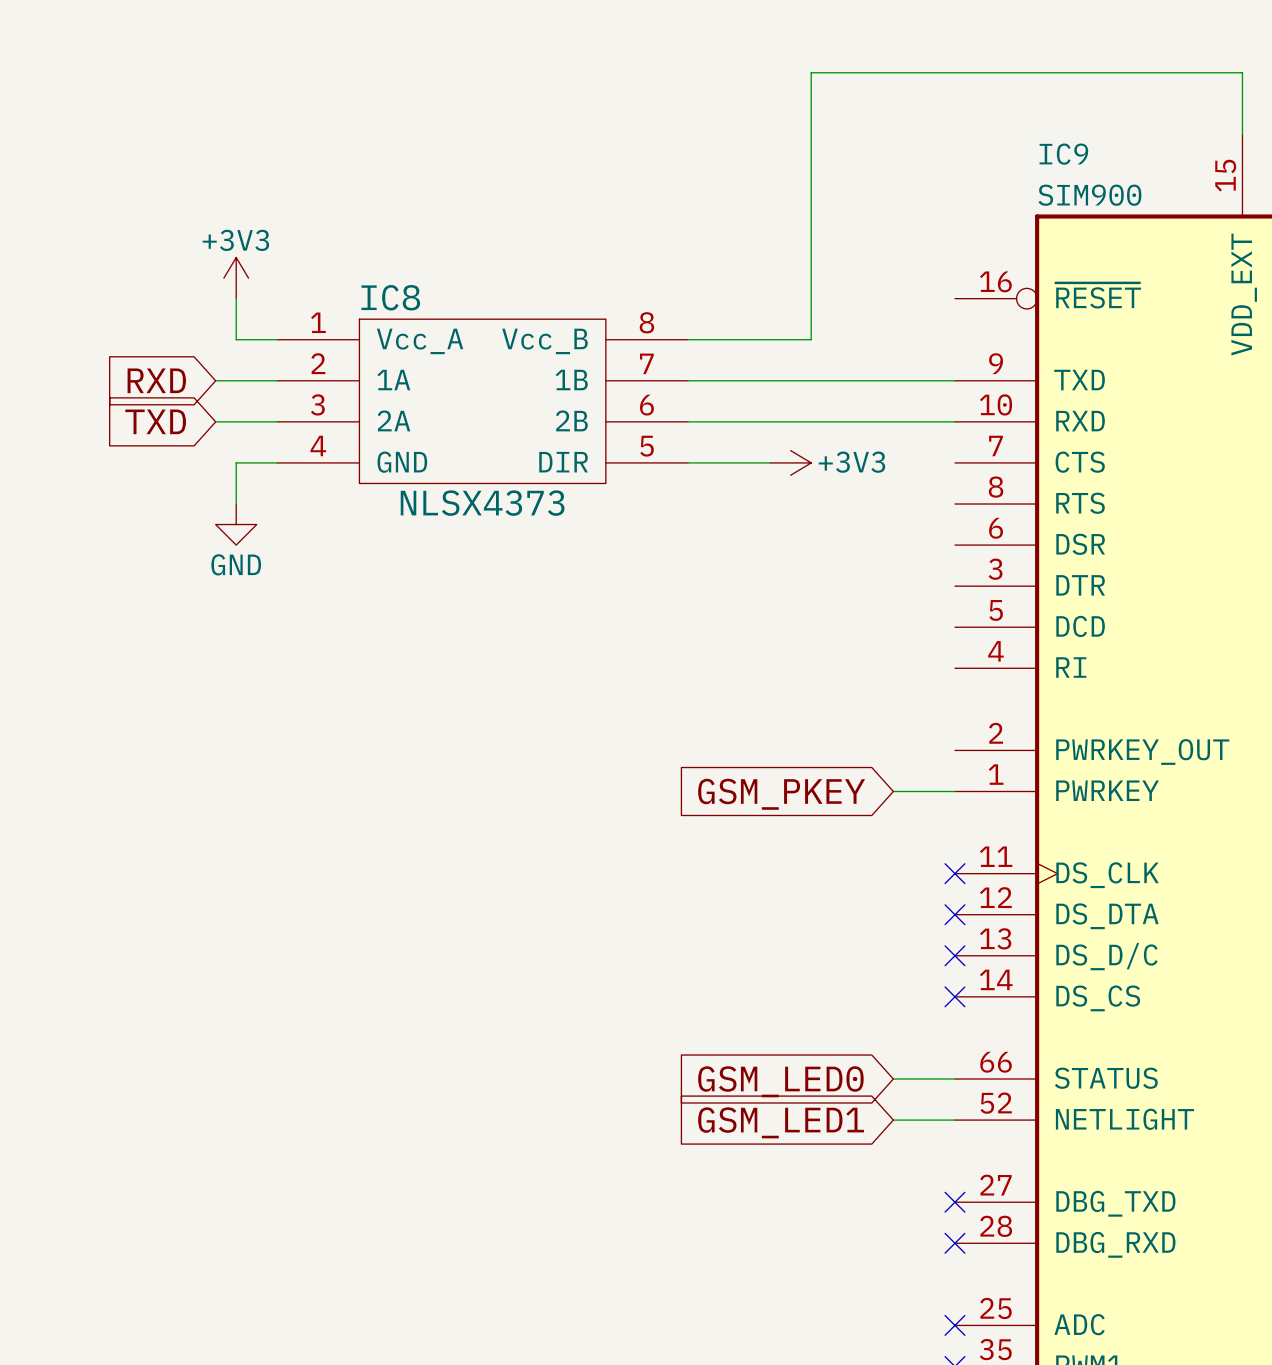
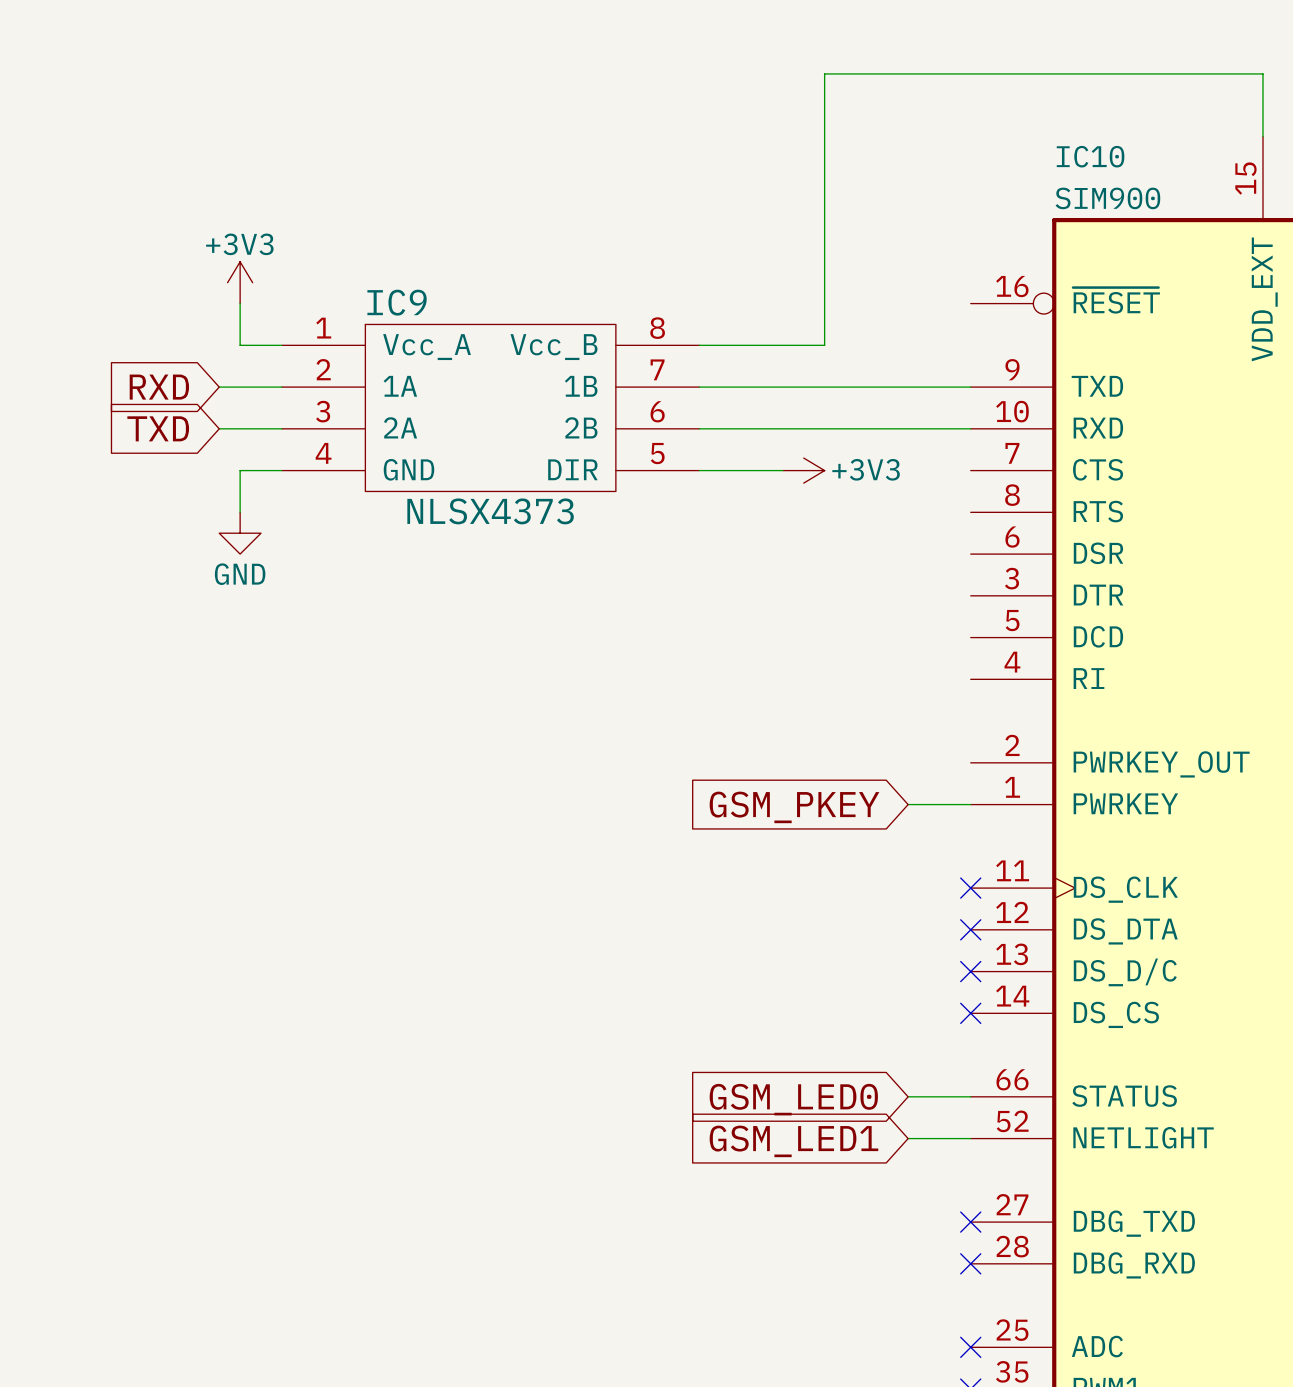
IC9 name: IC9 (1063, 154) -> IC10 (1090, 156)
IC8 name: IC8 (390, 297) -> IC9 (397, 302)

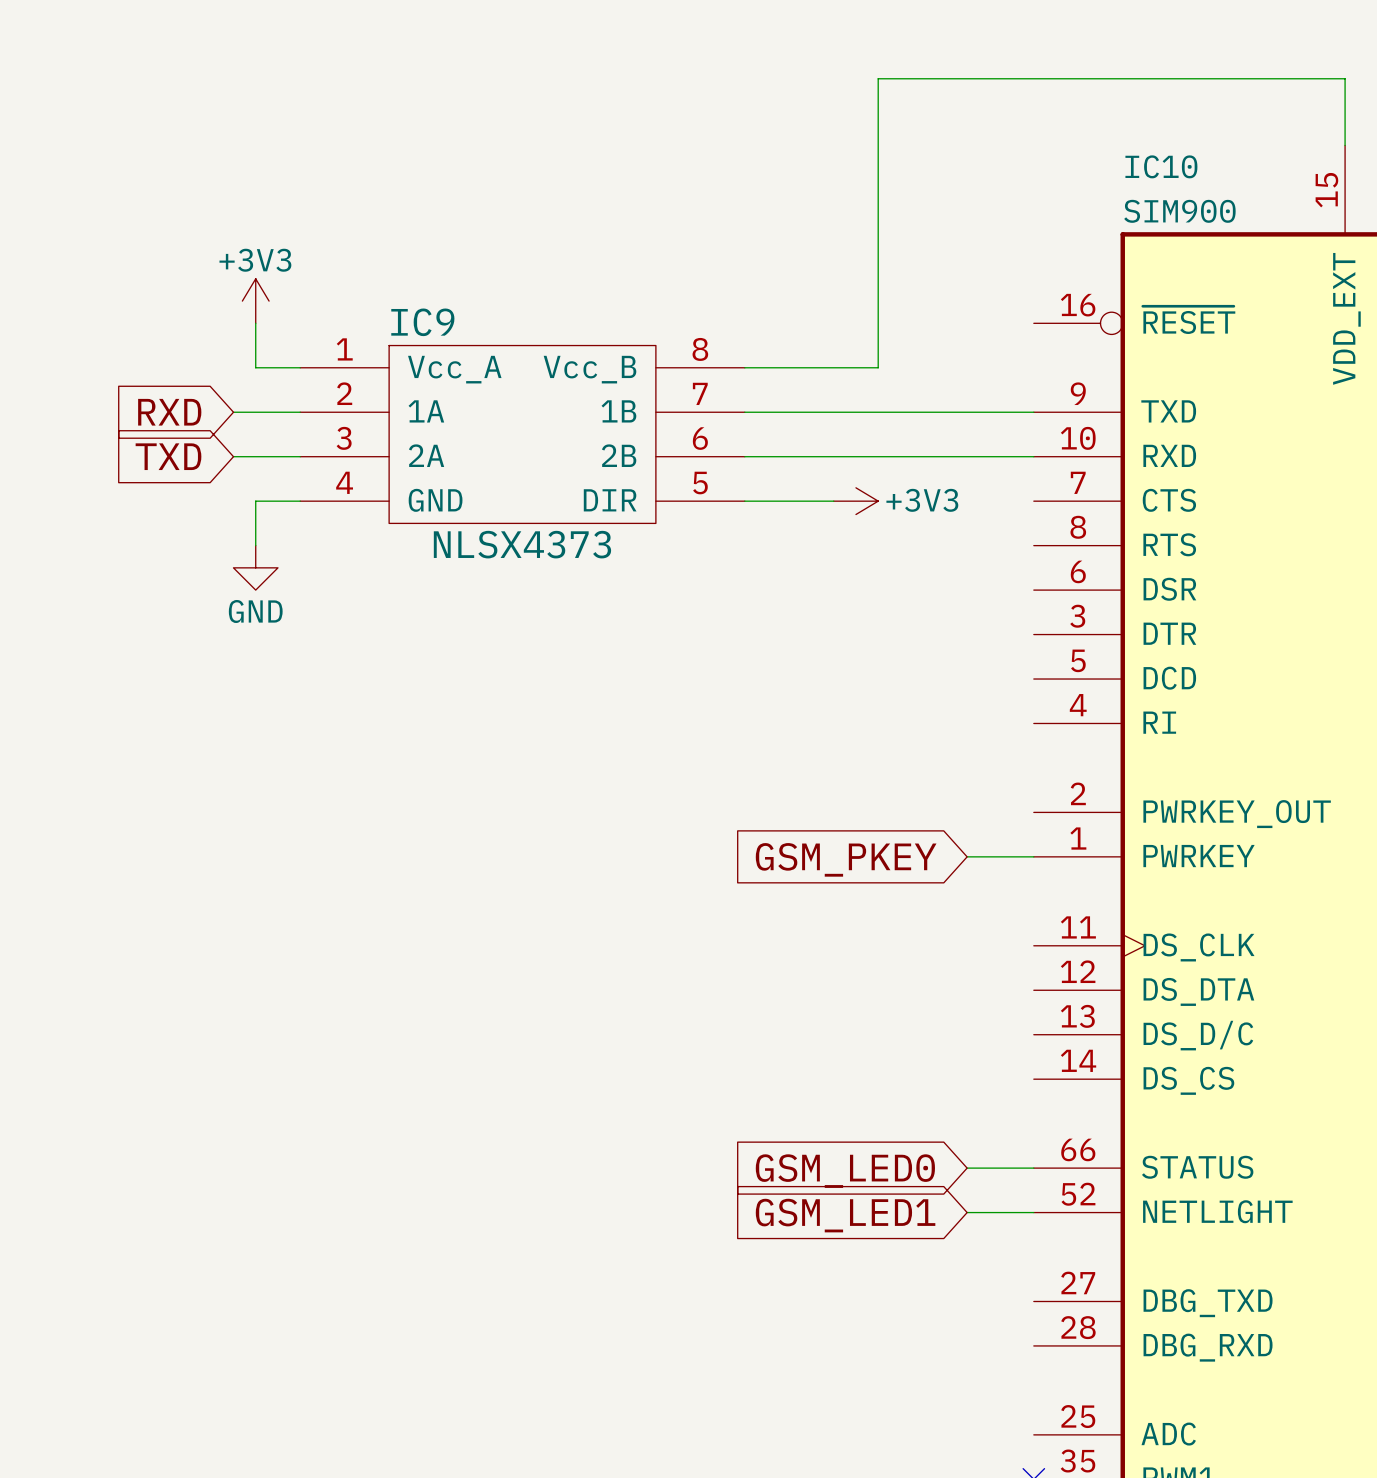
no-connect mark: (970, 888) -> none
no-connect mark: (970, 929) -> none
no-connect mark: (970, 971) -> none
no-connect mark: (970, 1013) -> none
no-connect mark: (970, 1222) -> none
no-connect mark: (970, 1263) -> none
no-connect mark: (970, 1347) -> none

